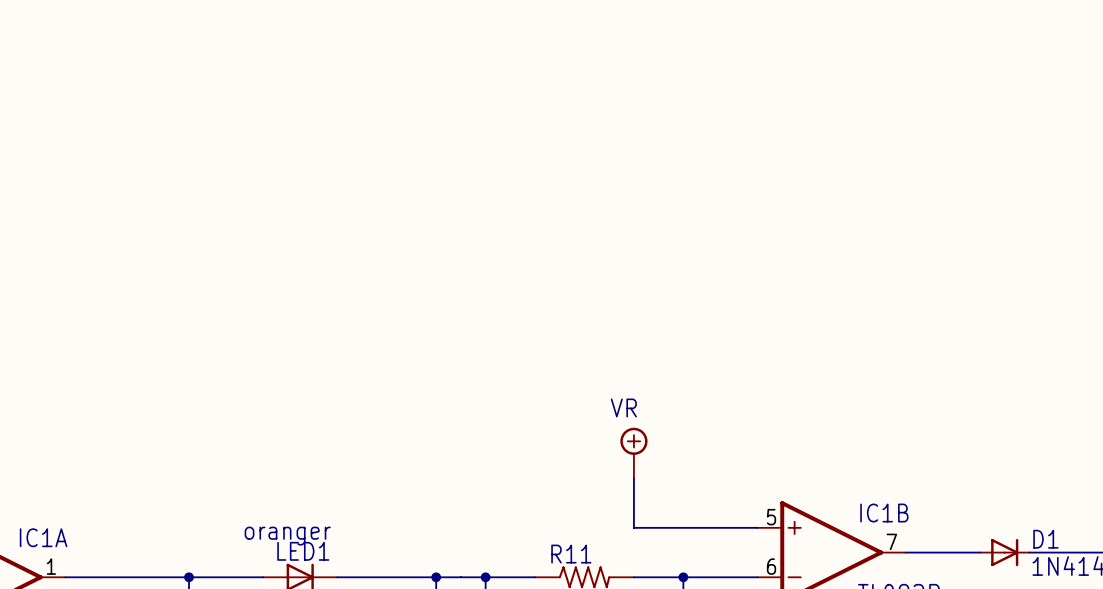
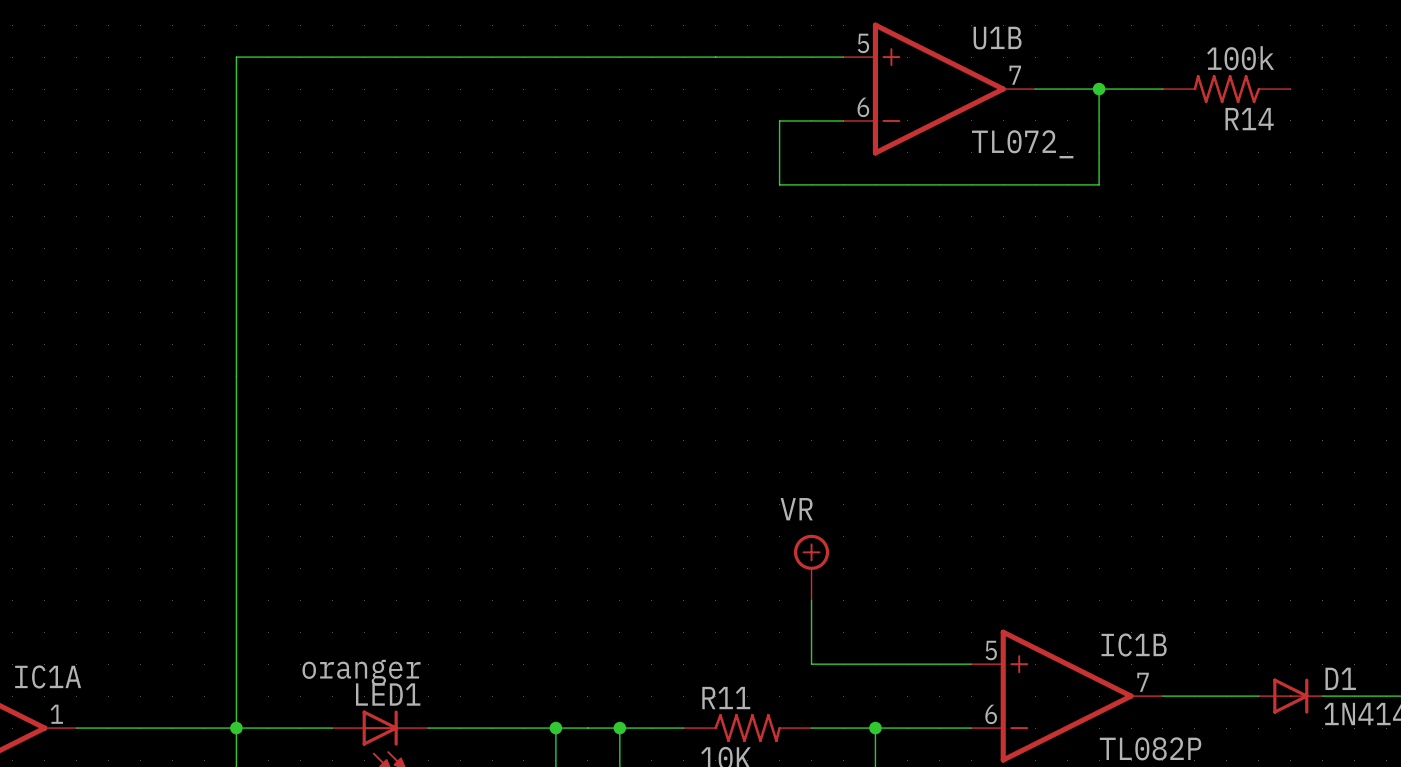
wire: none -> (843, 57) (236, 57) (236, 728)
U1B: none -> TL072_ (939, 89)
wire: none -> (1035, 89) (1162, 89)
wire: none -> (1099, 89) (1099, 184) (779, 184) (779, 120) (843, 120)
junction: none -> (1099, 89)
R14: none -> 100k (1226, 89)

